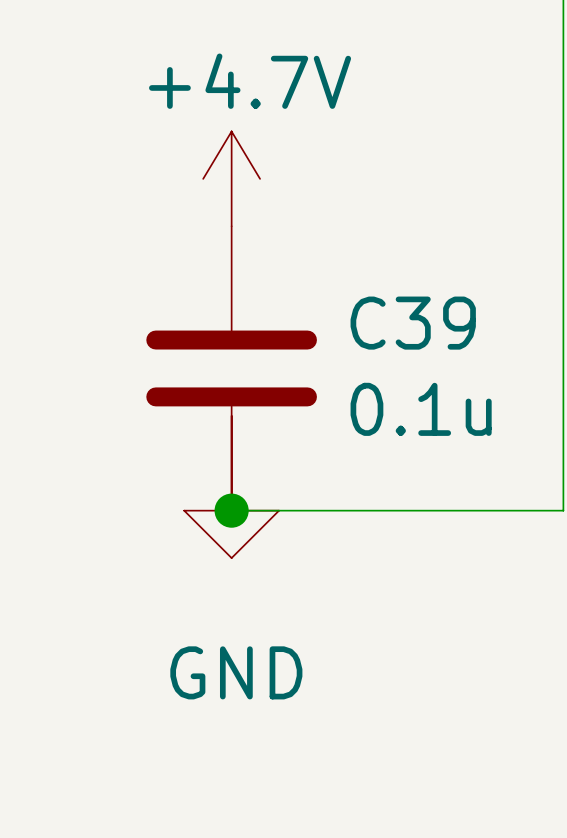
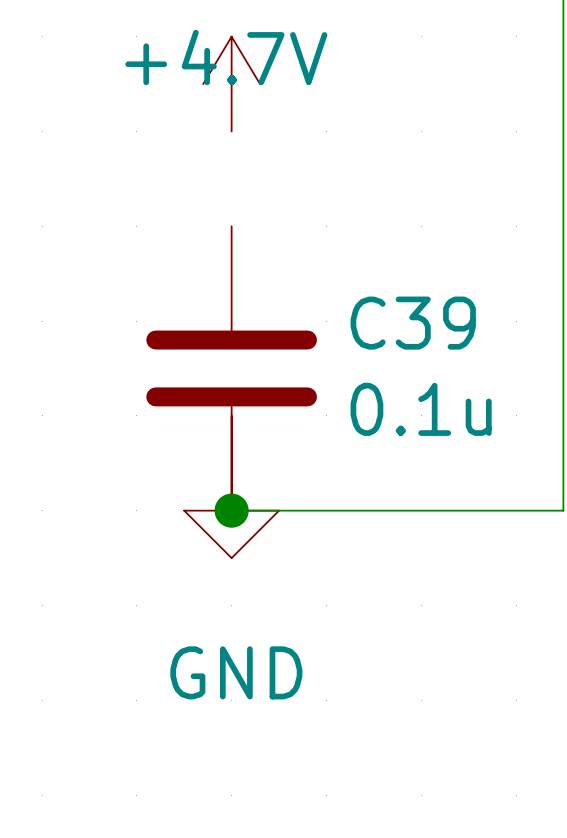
power symbol text position: +4.7V (250, 81) -> +4.7V (226, 57)
power symbol position: +4.7V (231, 178) -> +4.7V (231, 84)

